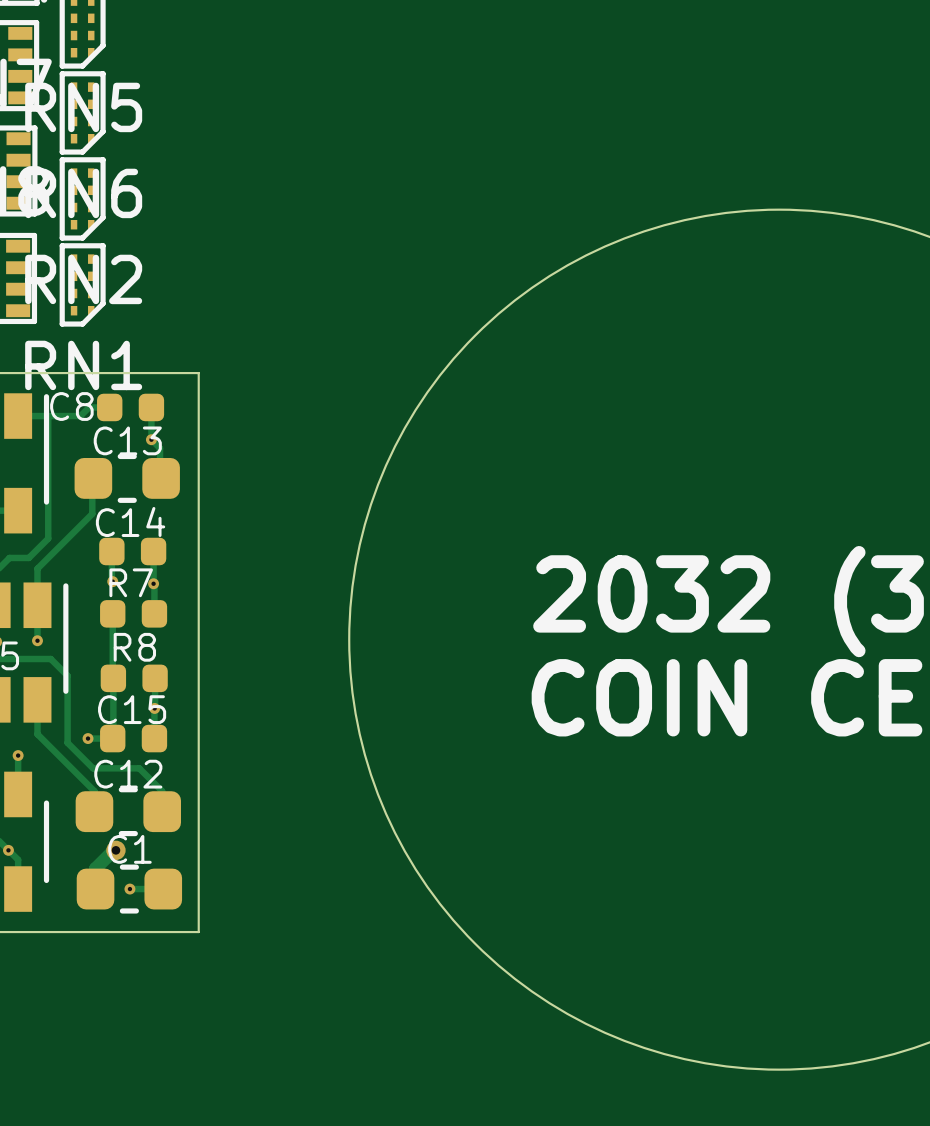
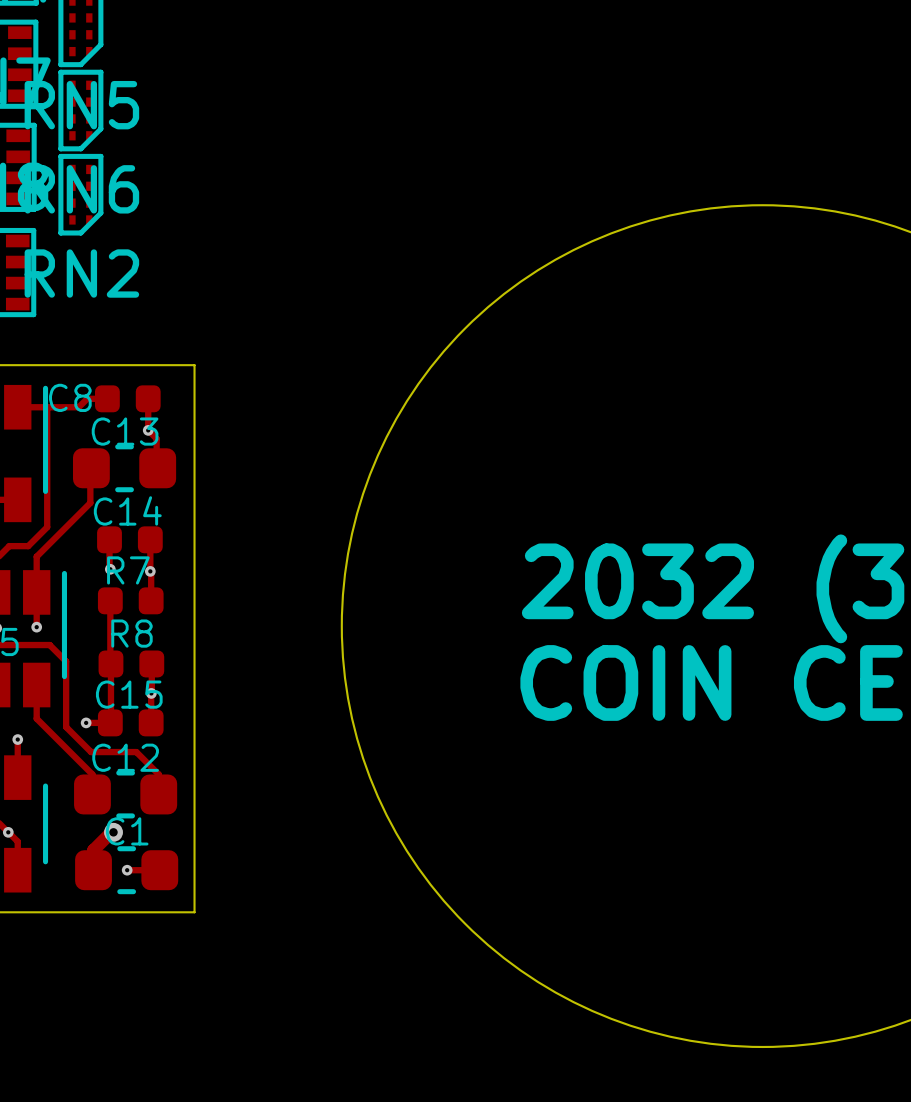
RN1: (82, 284) -> none

